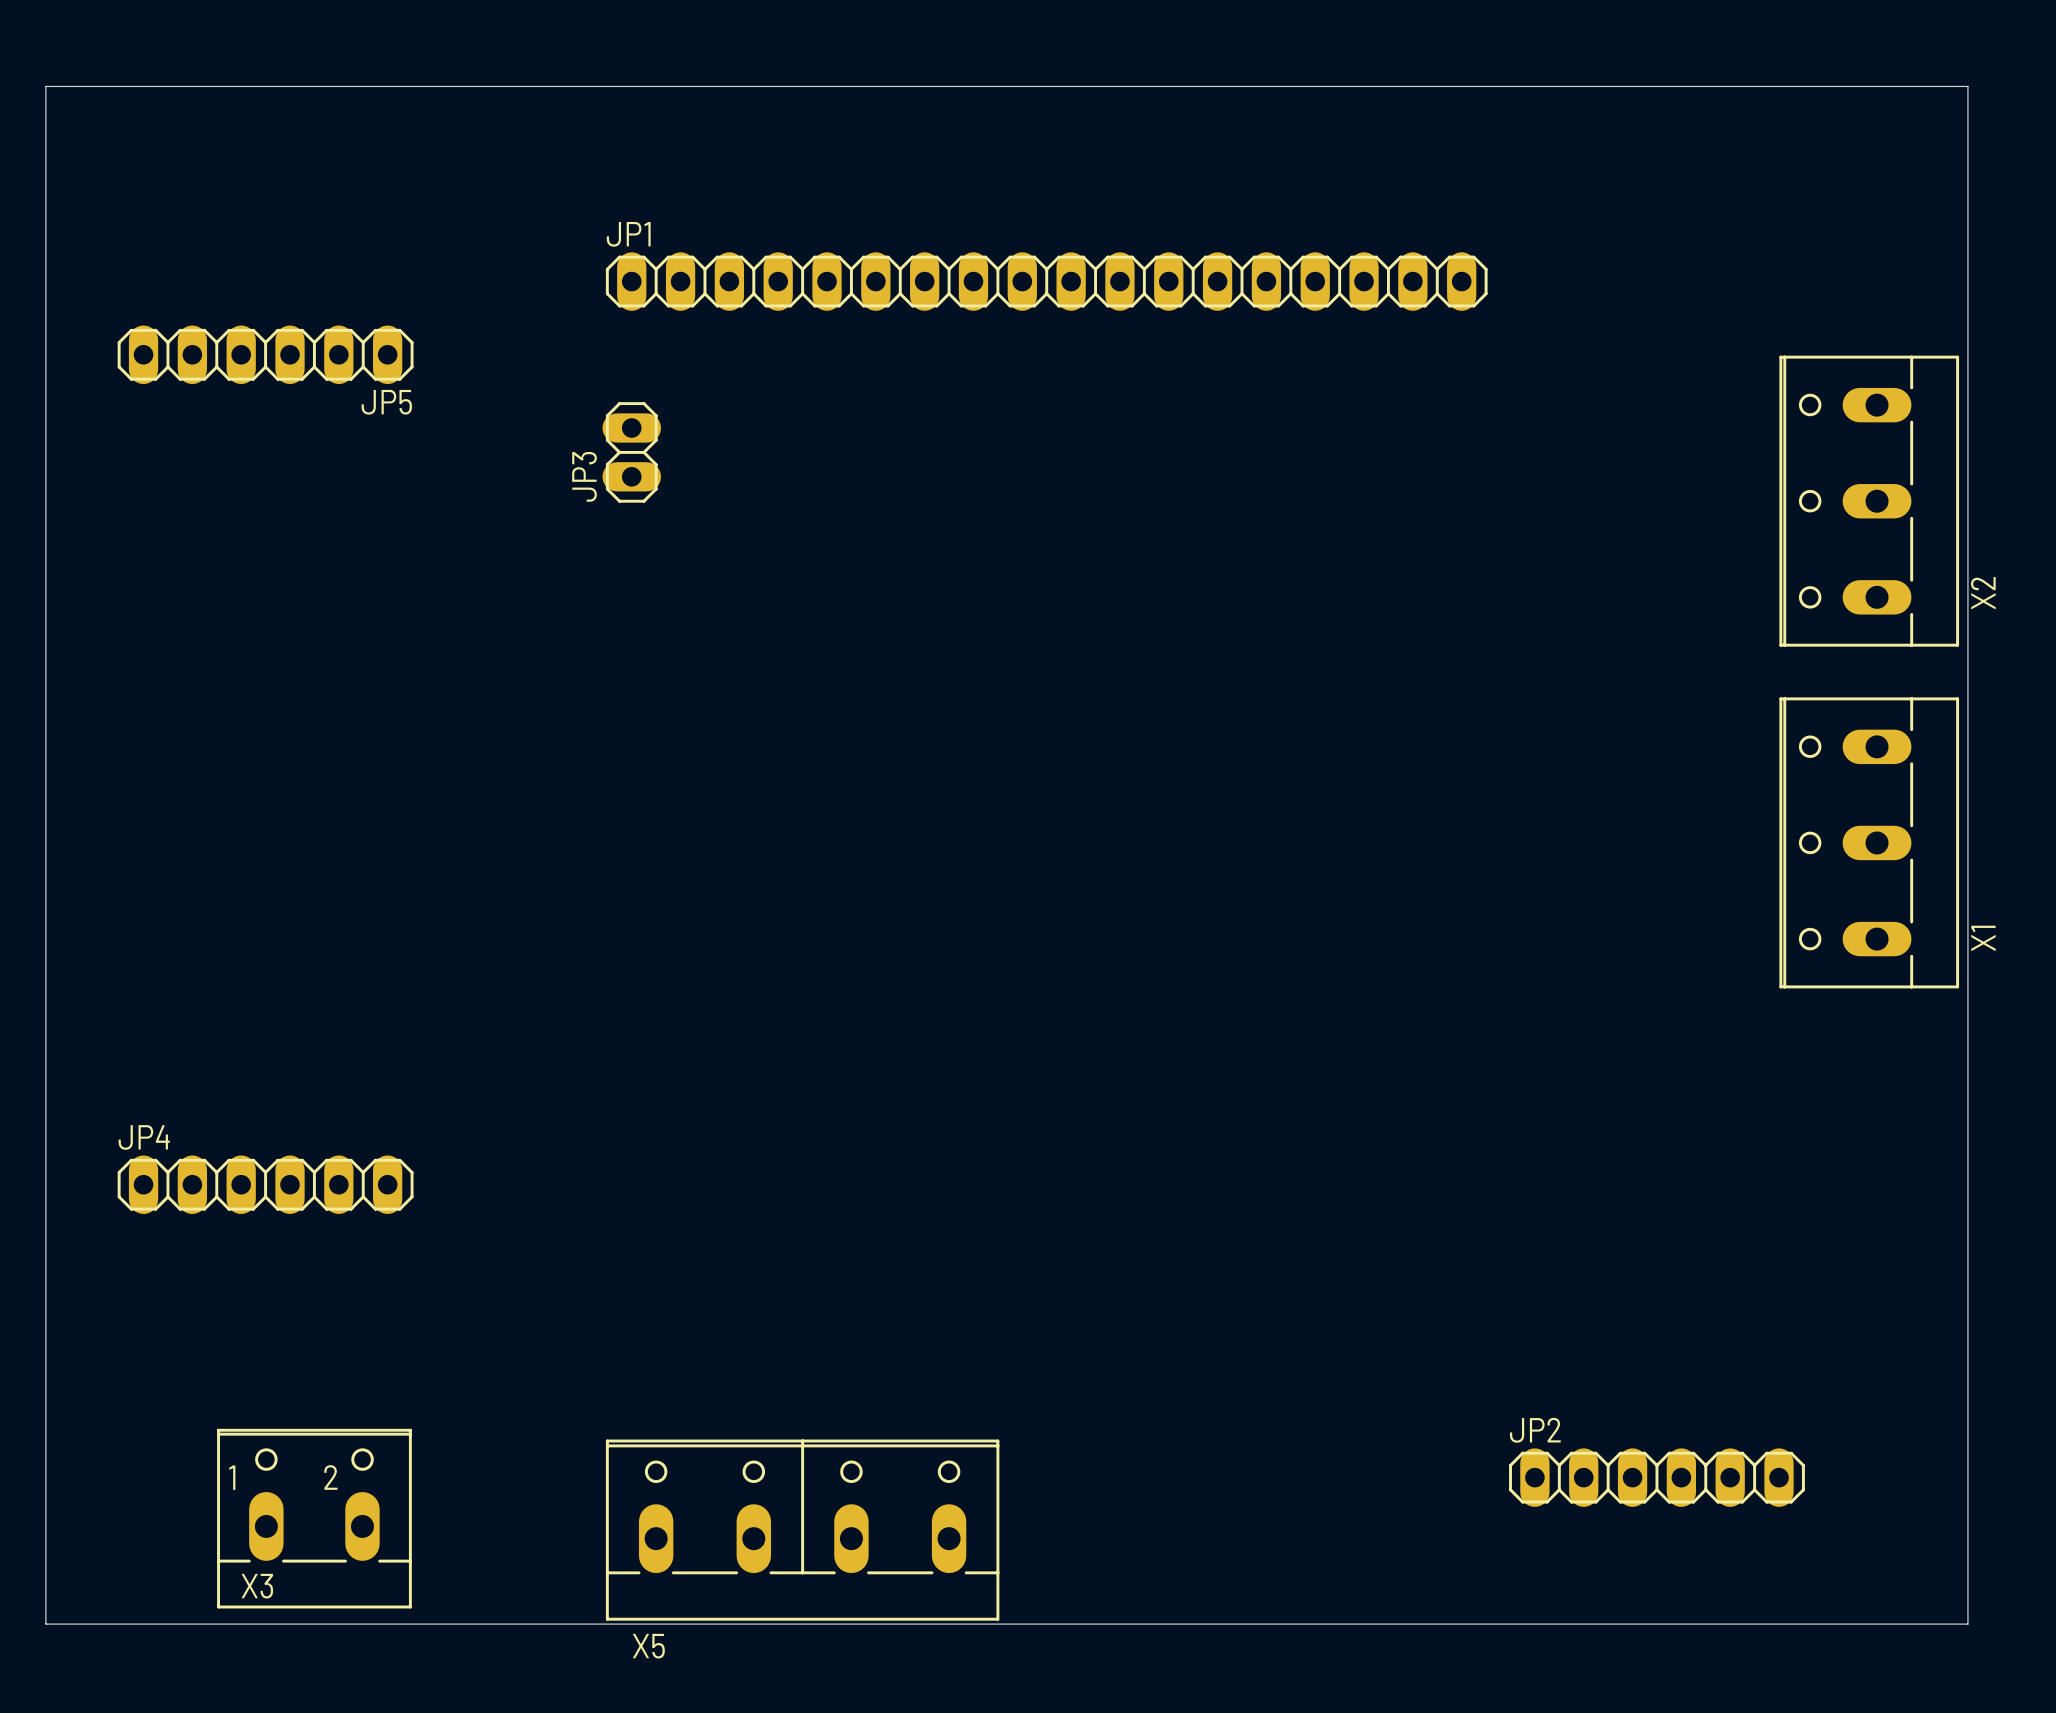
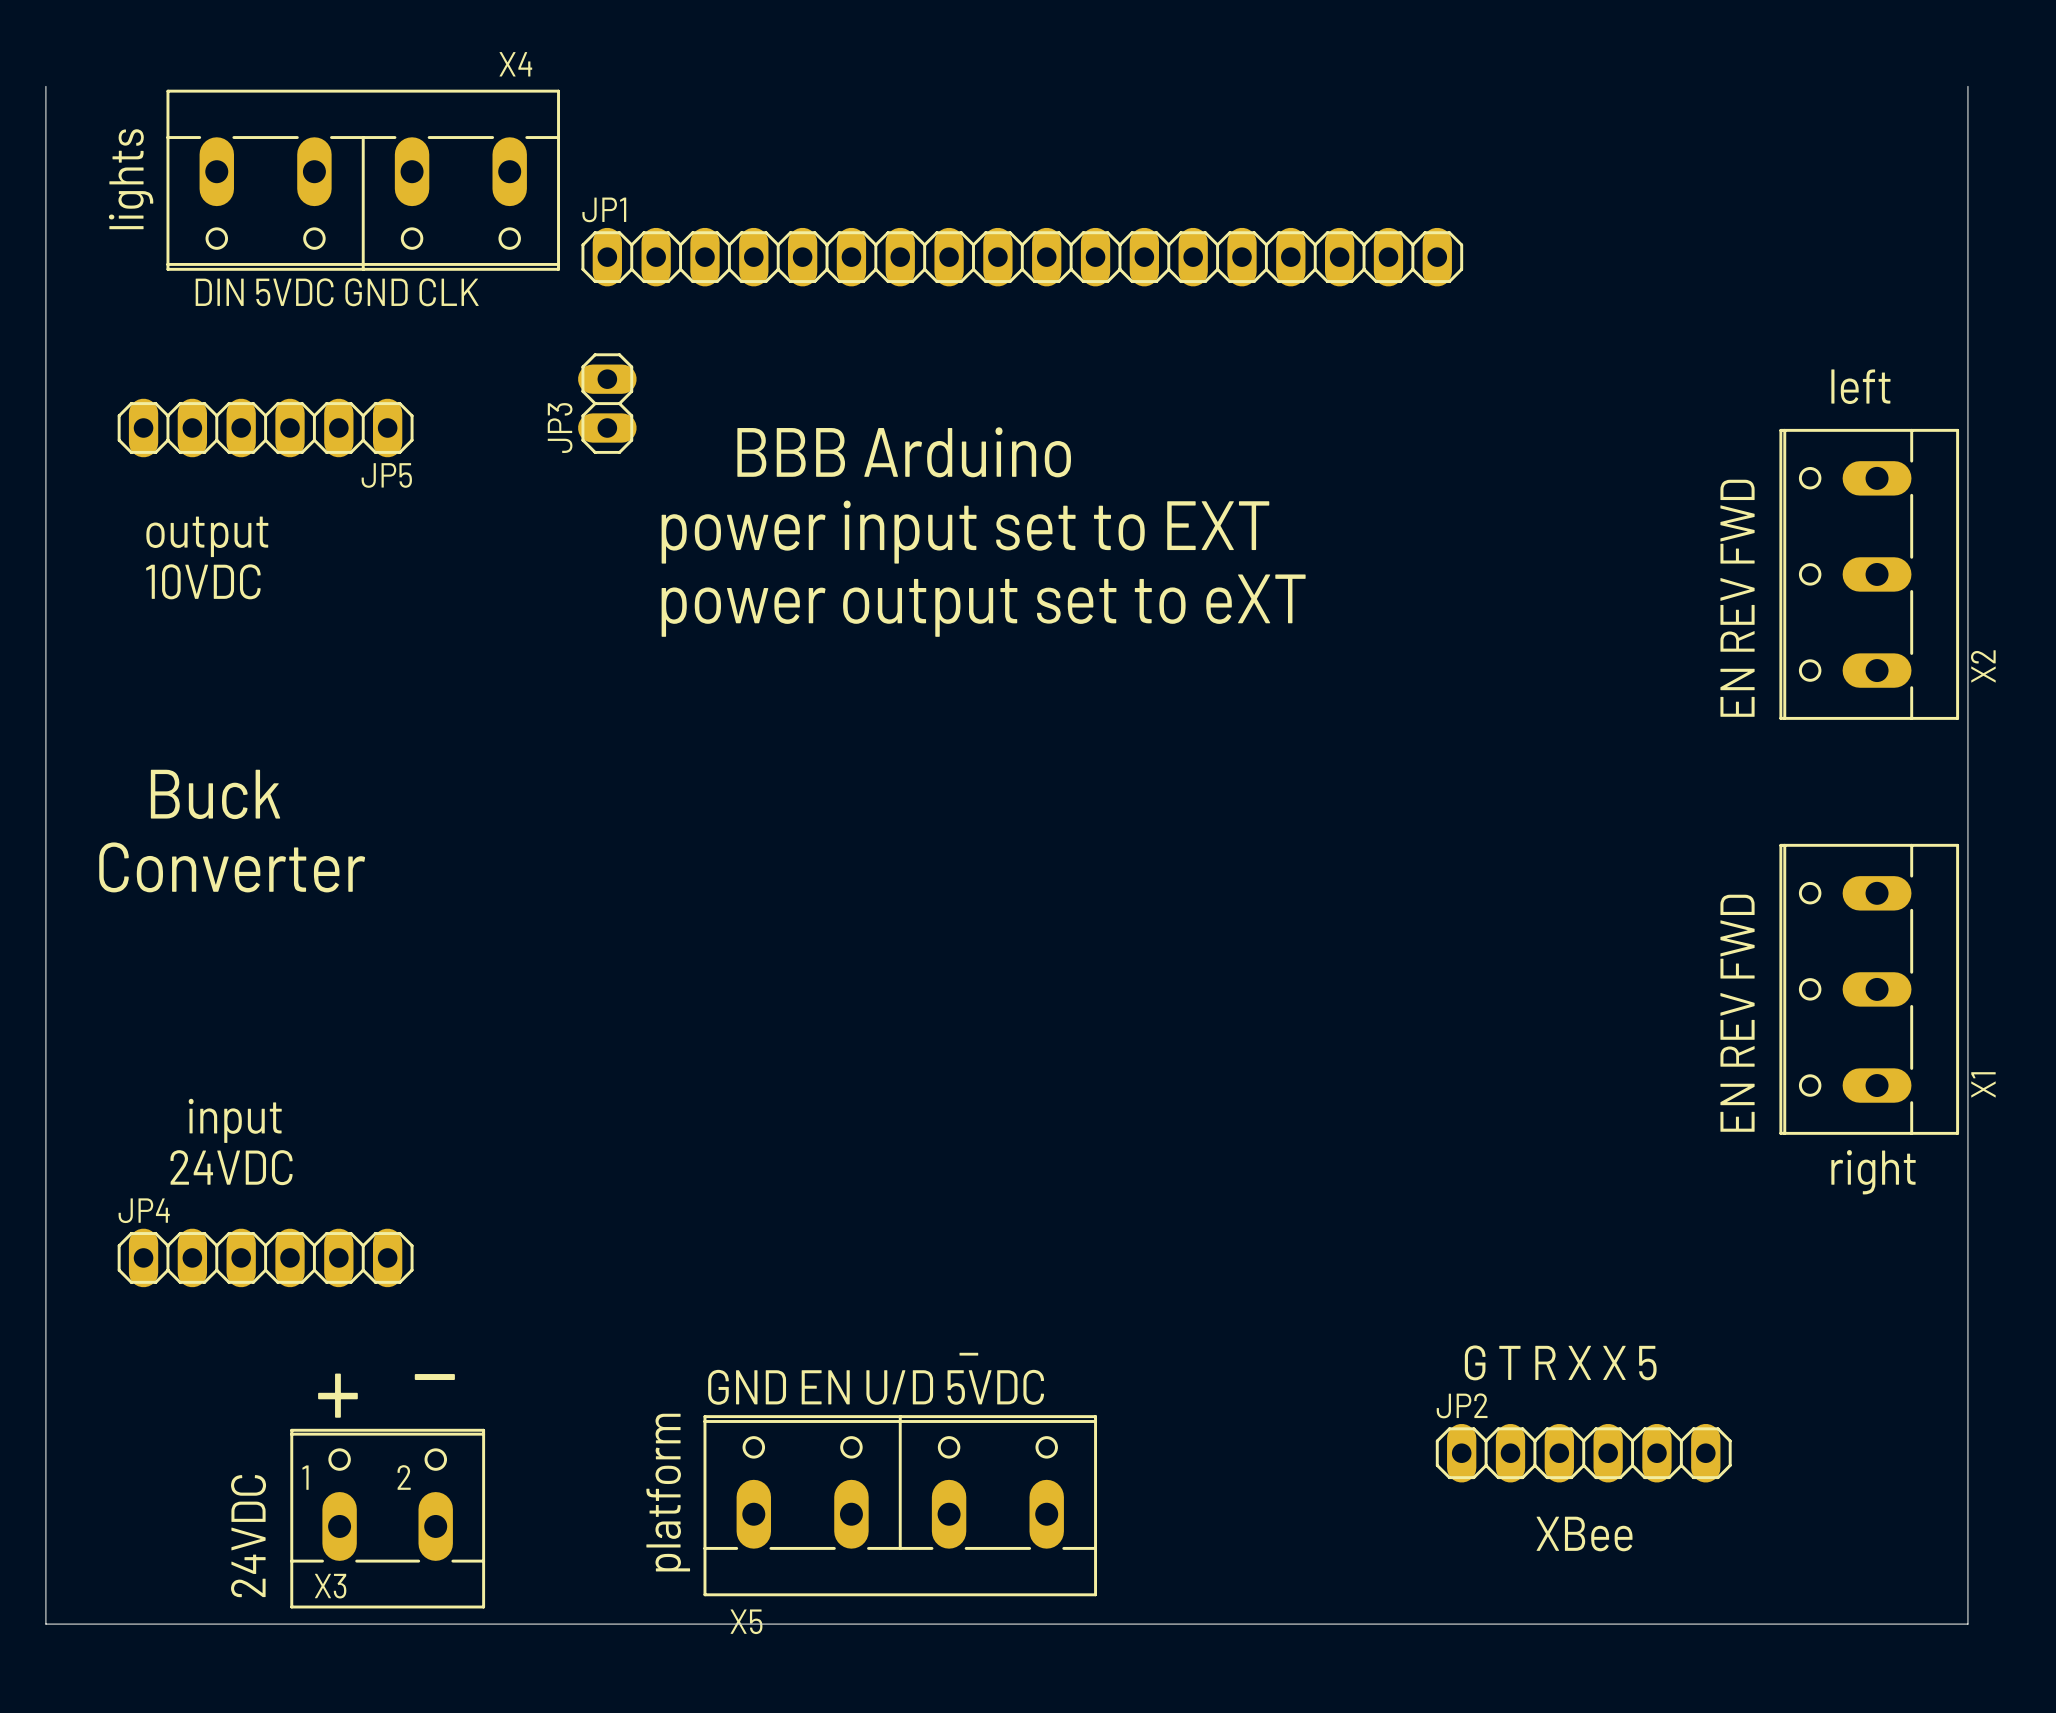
board edge: (45, 86) (1967, 86) -> none
text: none -> lights (131, 179)
X4: none -> (363, 180)
JP1 position: (1046, 281) -> (1022, 257)
text: none -> DIN 5VDC GND CLK (337, 292)
JP5 position: (265, 354) -> (265, 428)
text: none -> left (1860, 386)
JP3 position: (631, 452) -> (607, 403)
text: none -> BBB Arduino (904, 452)
X2 position: (1869, 501) -> (1869, 574)
text: none -> power input set to EXT (965, 532)
text: none -> output (207, 536)
text: none -> 10VDC (203, 581)
text: none -> EN REV FWD (1737, 598)
text: none -> power output set to eXT (983, 605)
text: none -> Buck (215, 794)
X1 position: (1869, 842) -> (1869, 989)
text: none -> Converter (232, 867)
text: none -> EN REV FWD (1737, 1013)
text: none -> input (235, 1120)
text: none -> 24VDC (231, 1167)
text: none -> right (1873, 1172)
JP4 position: (265, 1184) -> (265, 1257)
text: none -> _ (968, 1354)
text: none -> G T R X X 5 (1560, 1362)
text: none -> _ (434, 1377)
text: none -> GND EN U/D 5VDC (876, 1387)
text: none -> + (337, 1395)
JP2 position: (1656, 1477) -> (1583, 1453)
text: none -> platform (668, 1492)
X3 position: (314, 1518) -> (387, 1518)
X5 position: (802, 1530) -> (900, 1505)
text: none -> XBee (1584, 1533)
text: none -> 24VDC (248, 1536)

